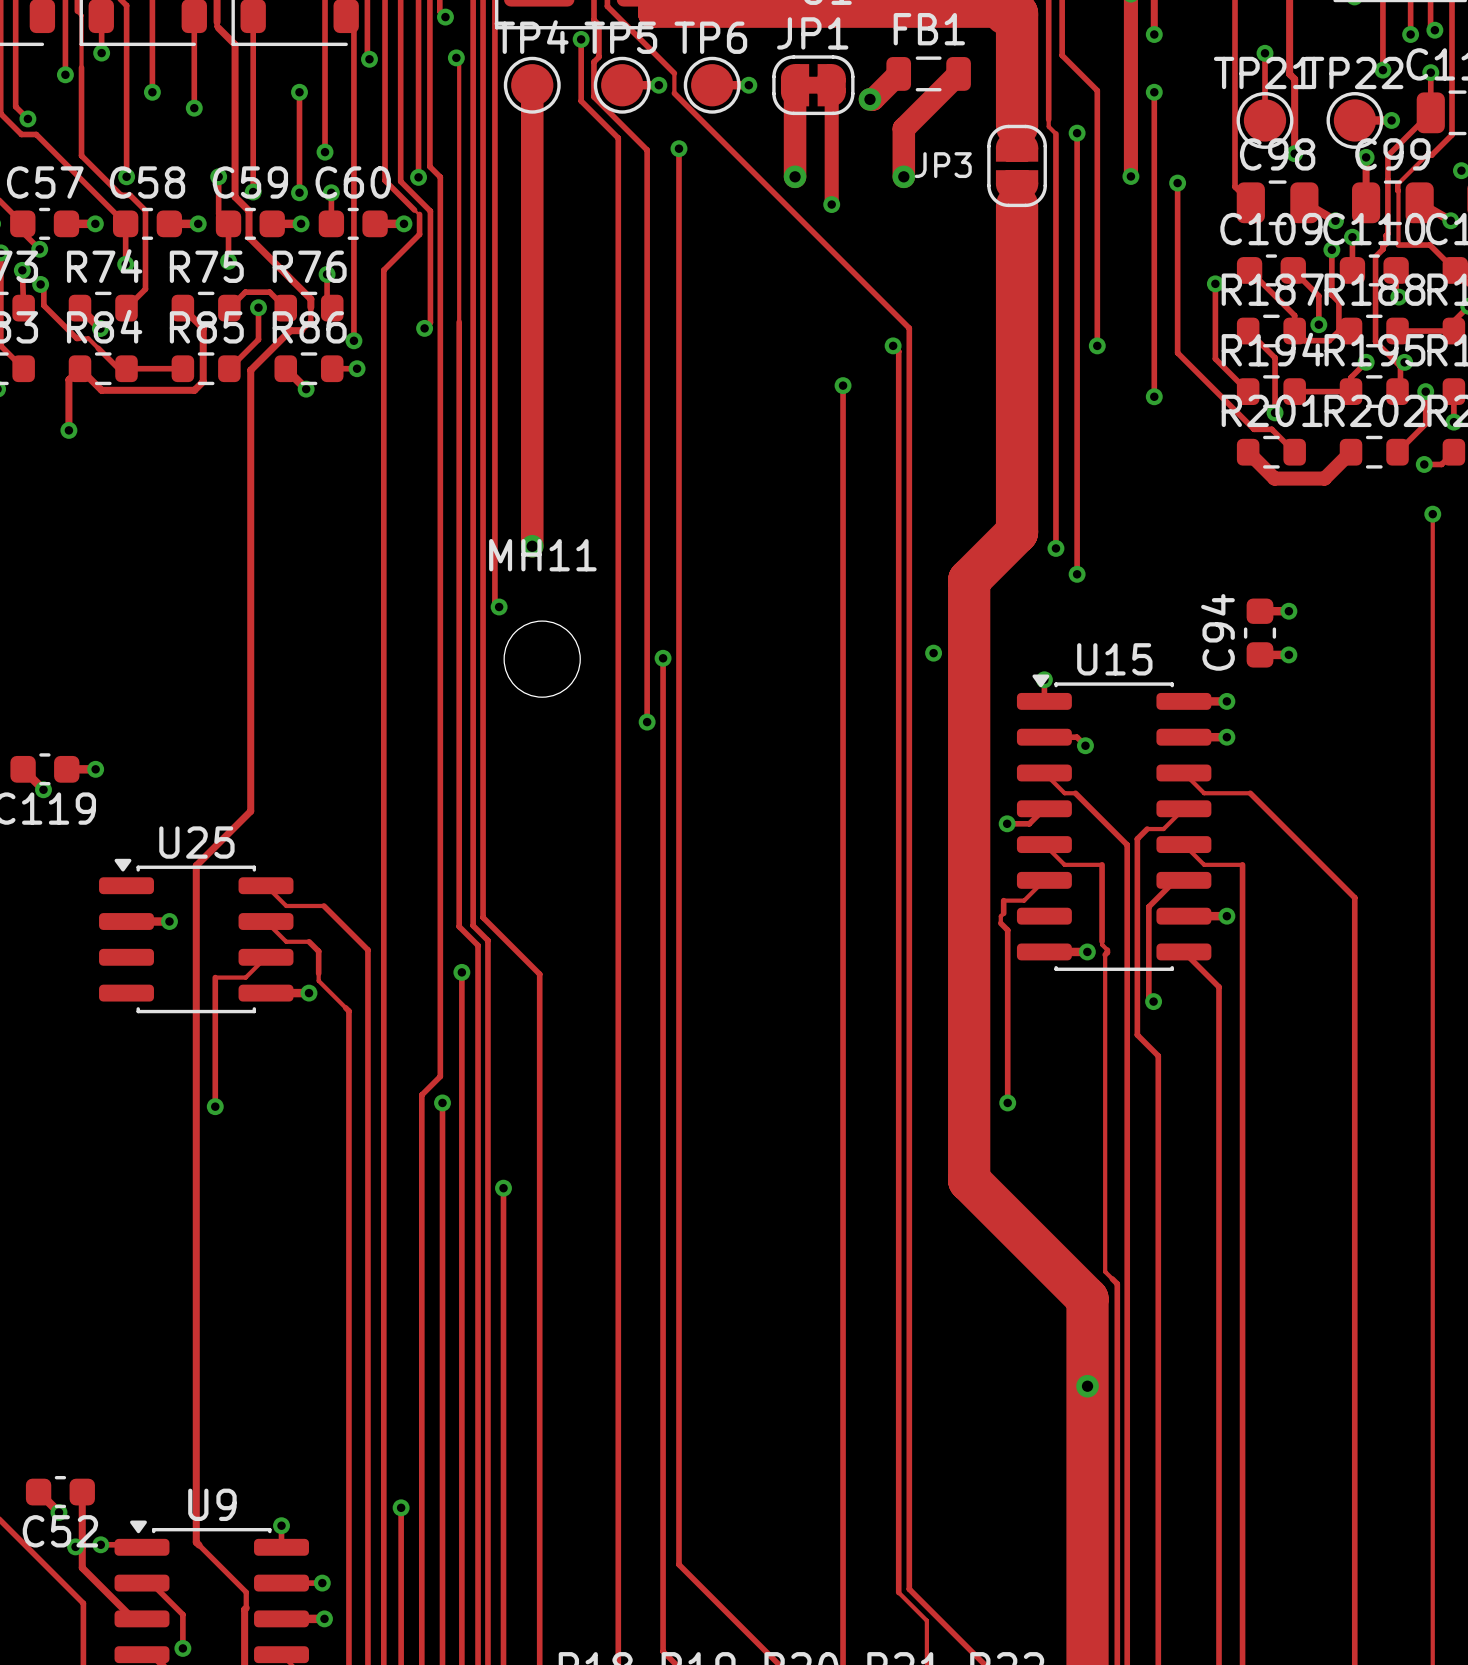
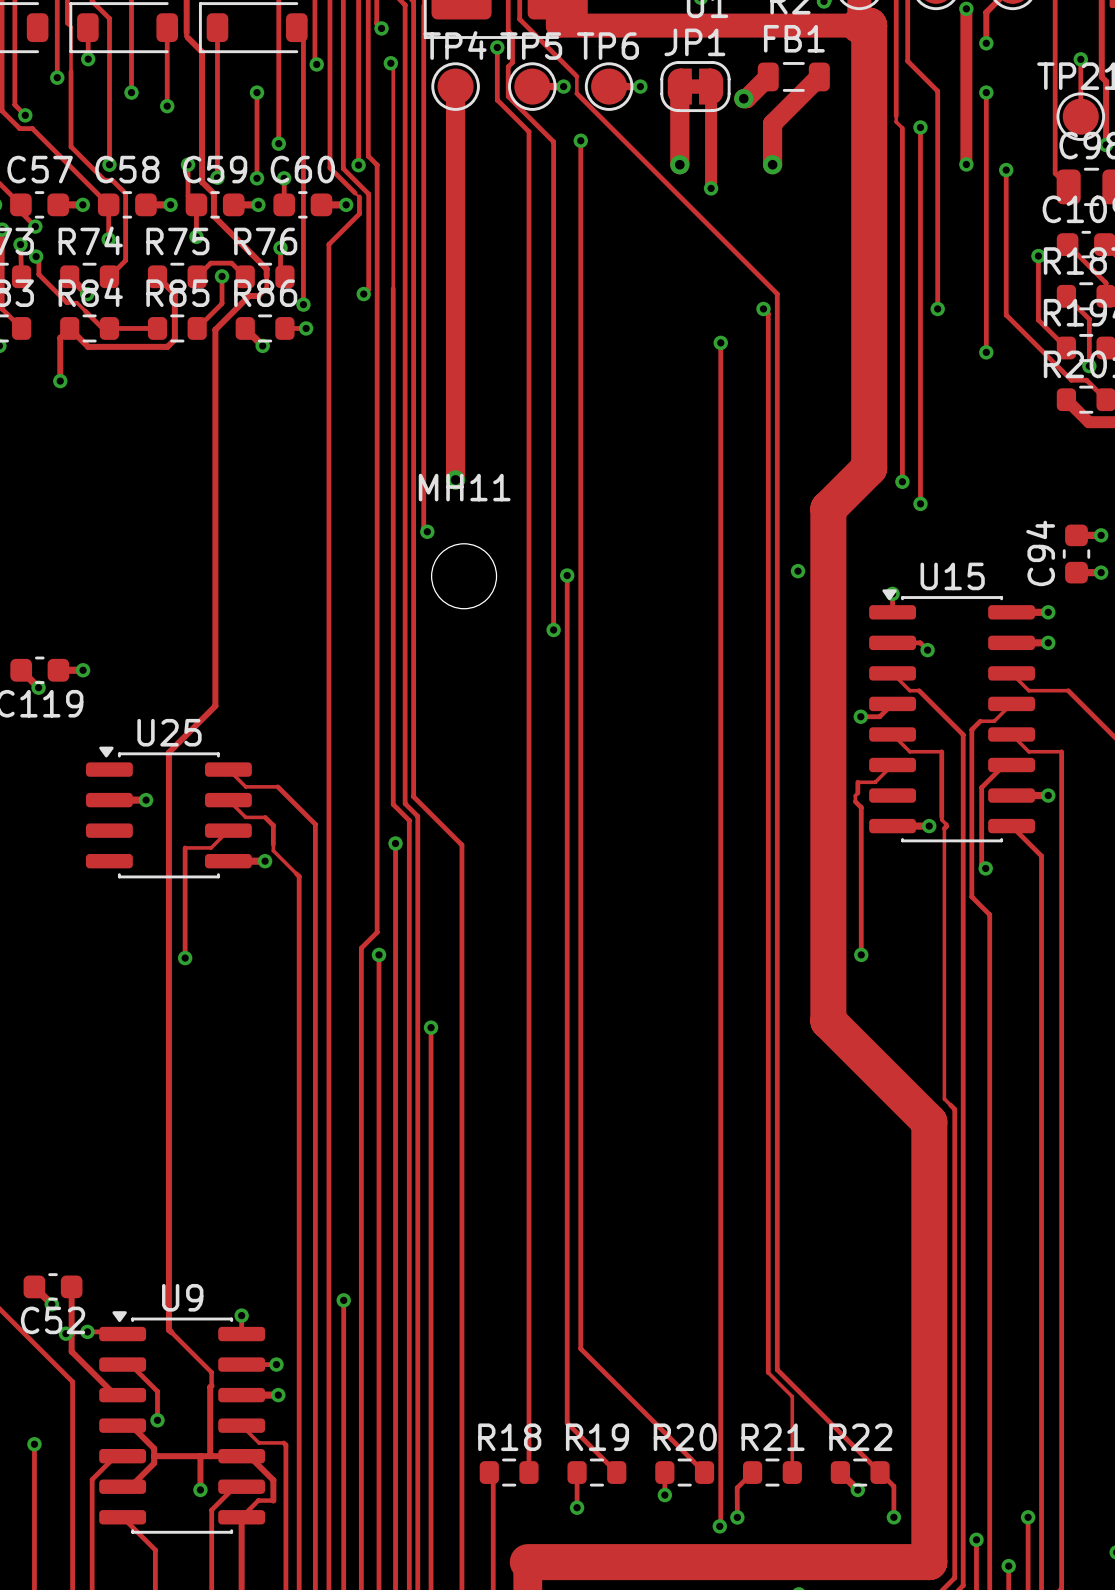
track: none -> (869, 121) (869, 189)
JP3: (1017, 165) -> none
via: (1087, 1386) -> none

